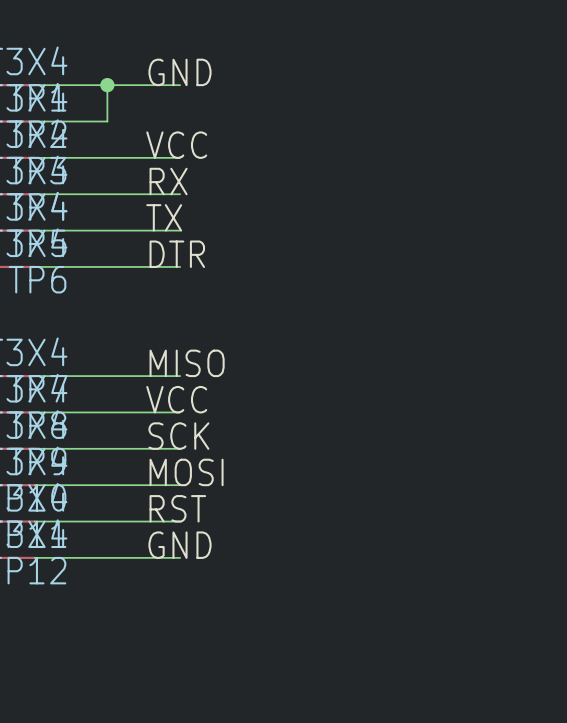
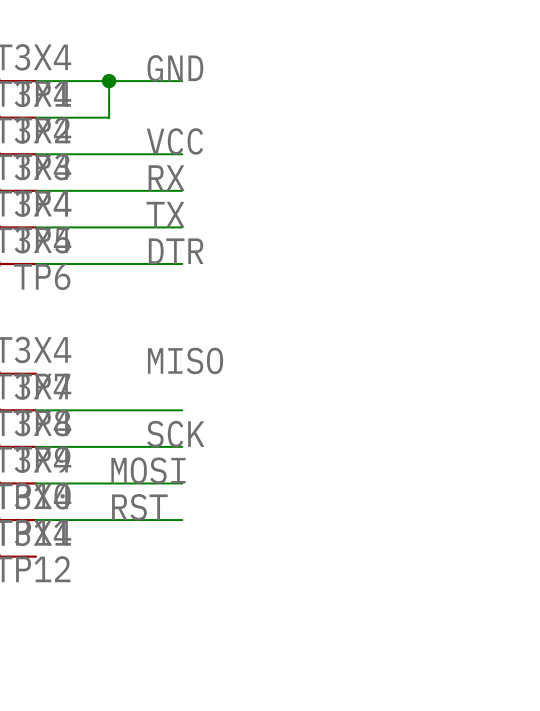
wire: (34, 376) (180, 376) -> none
label: VCC (176, 399) -> none
label position: MOSI (186, 472) -> MOSI (148, 470)
label position: RST (177, 508) -> RST (139, 507)
label: GND (180, 545) -> none
wire: (34, 557) (180, 557) -> none

